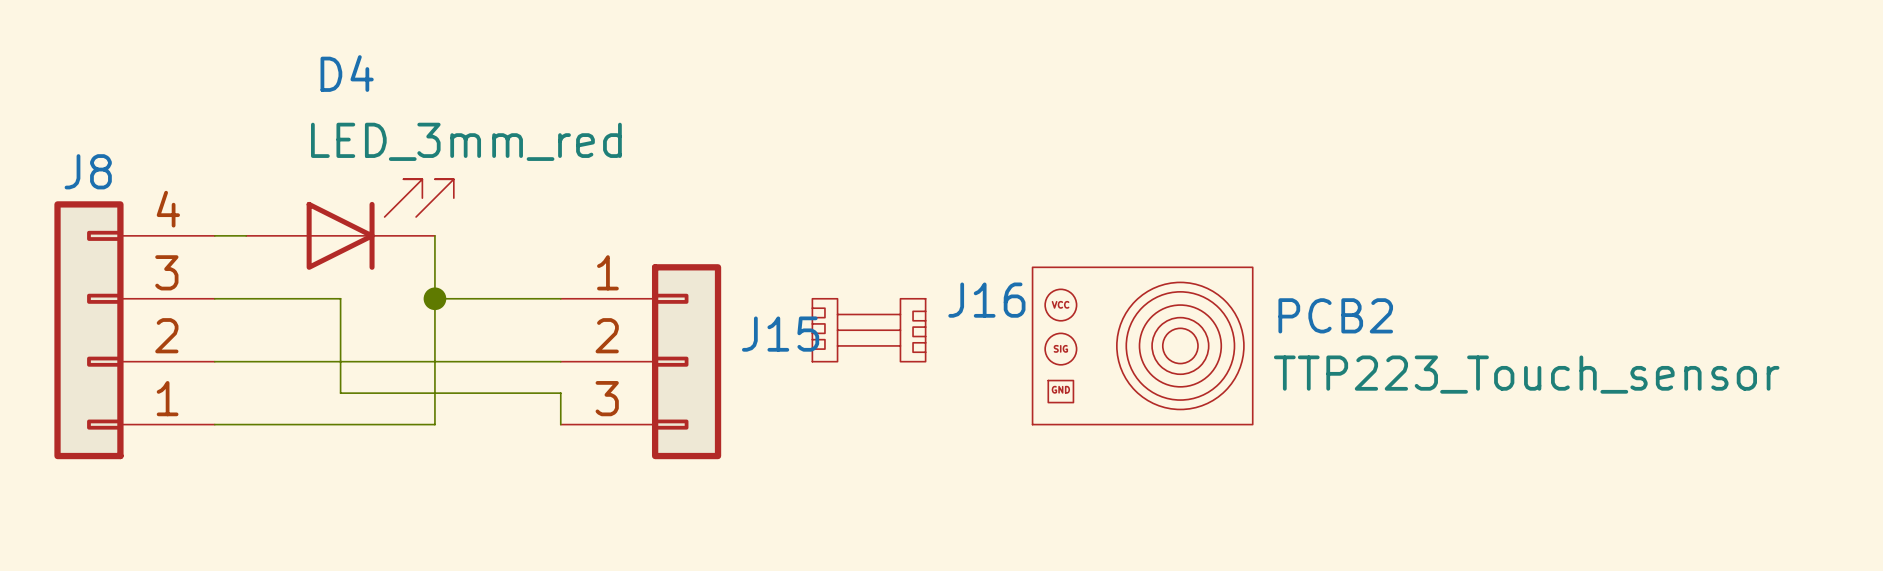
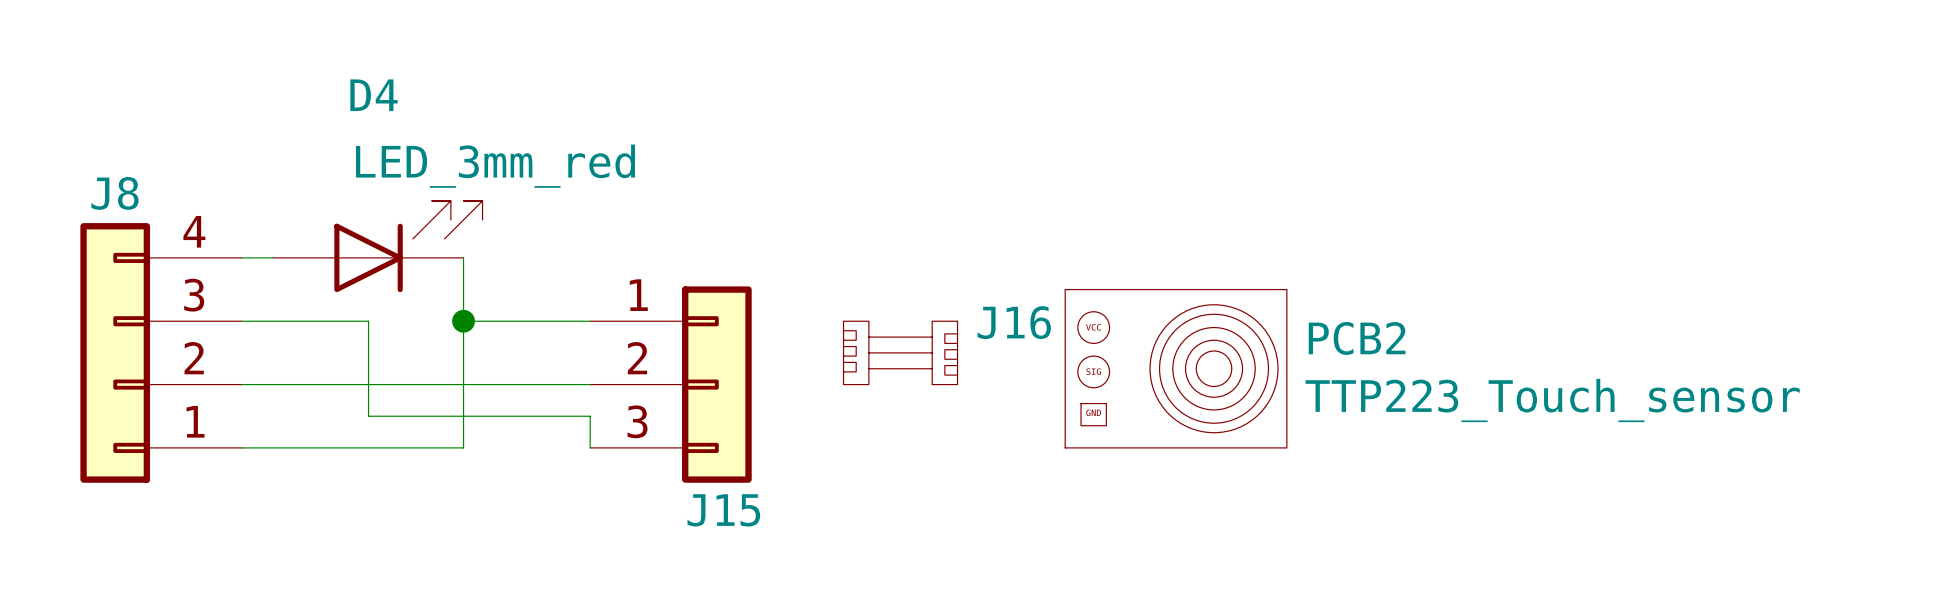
J15 name position: J15 (780, 334) -> J15 (723, 510)

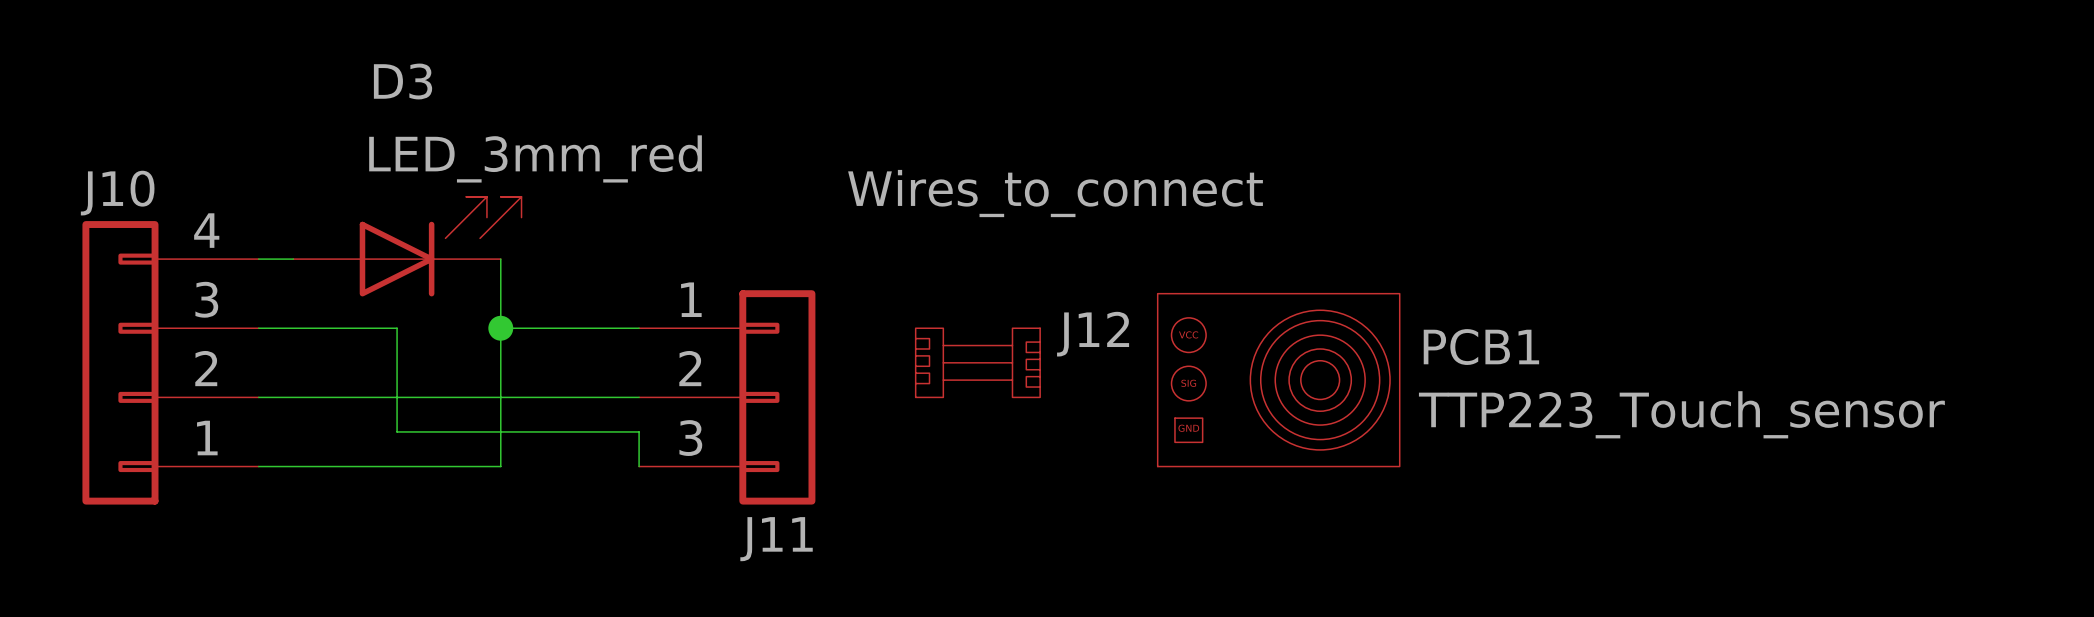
D4 name: D4 (374, 95) -> D3 (403, 81)
J8 name: J8 (114, 193) -> J10 (117, 193)
J16 value: none -> Wires_to_connect (1055, 193)
J16 name: J16 (1014, 322) -> J12 (1093, 334)
PCB2 name: PCB2 (1357, 338) -> PCB1 (1481, 347)
J15 name: J15 (723, 510) -> J11 (776, 539)

